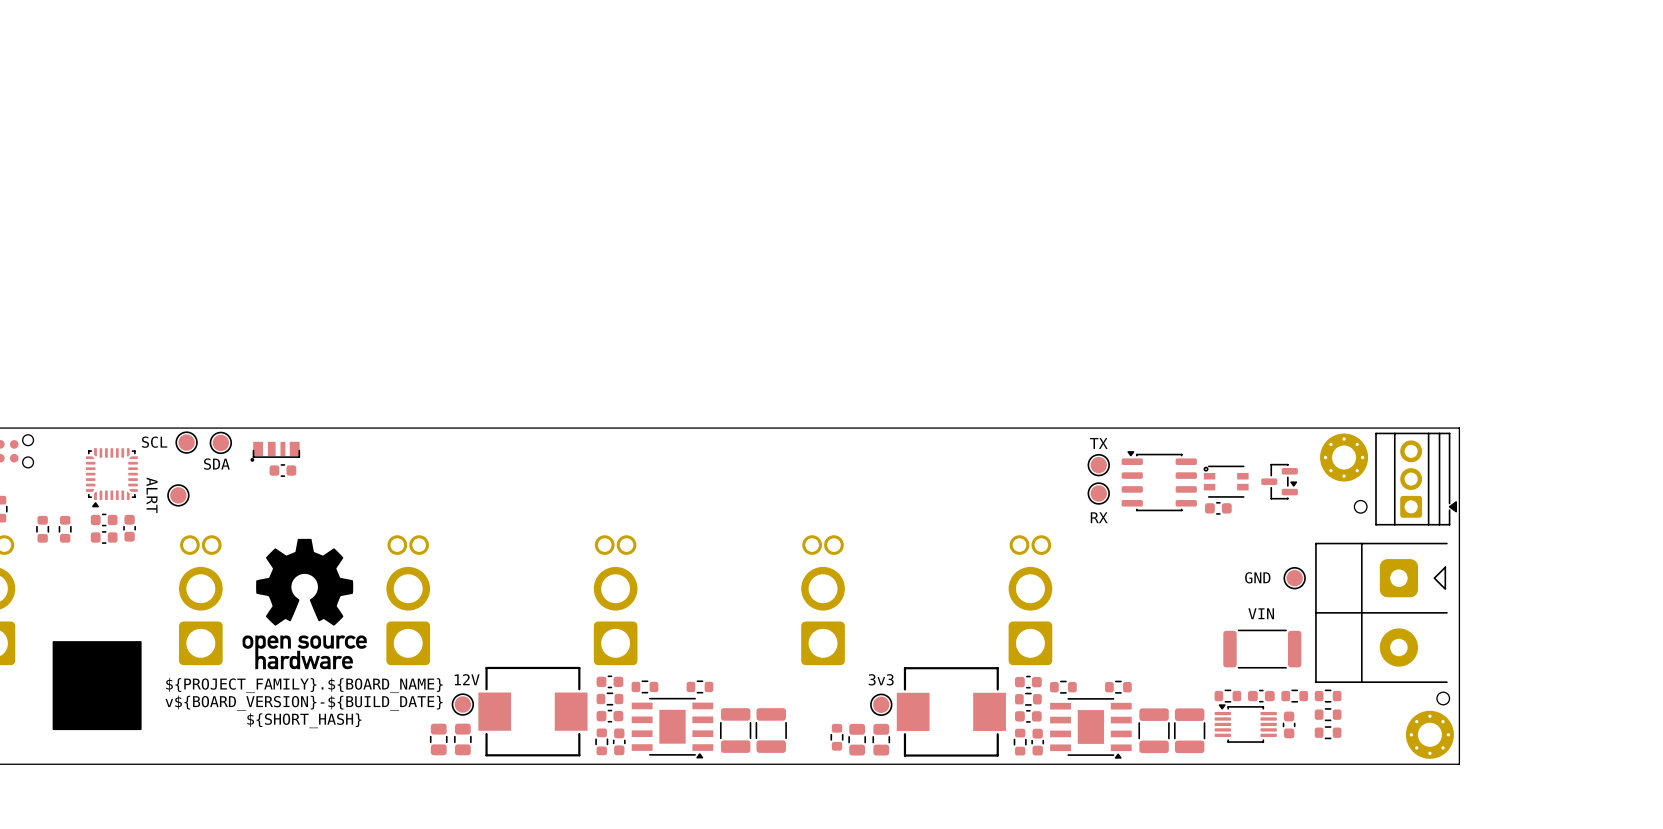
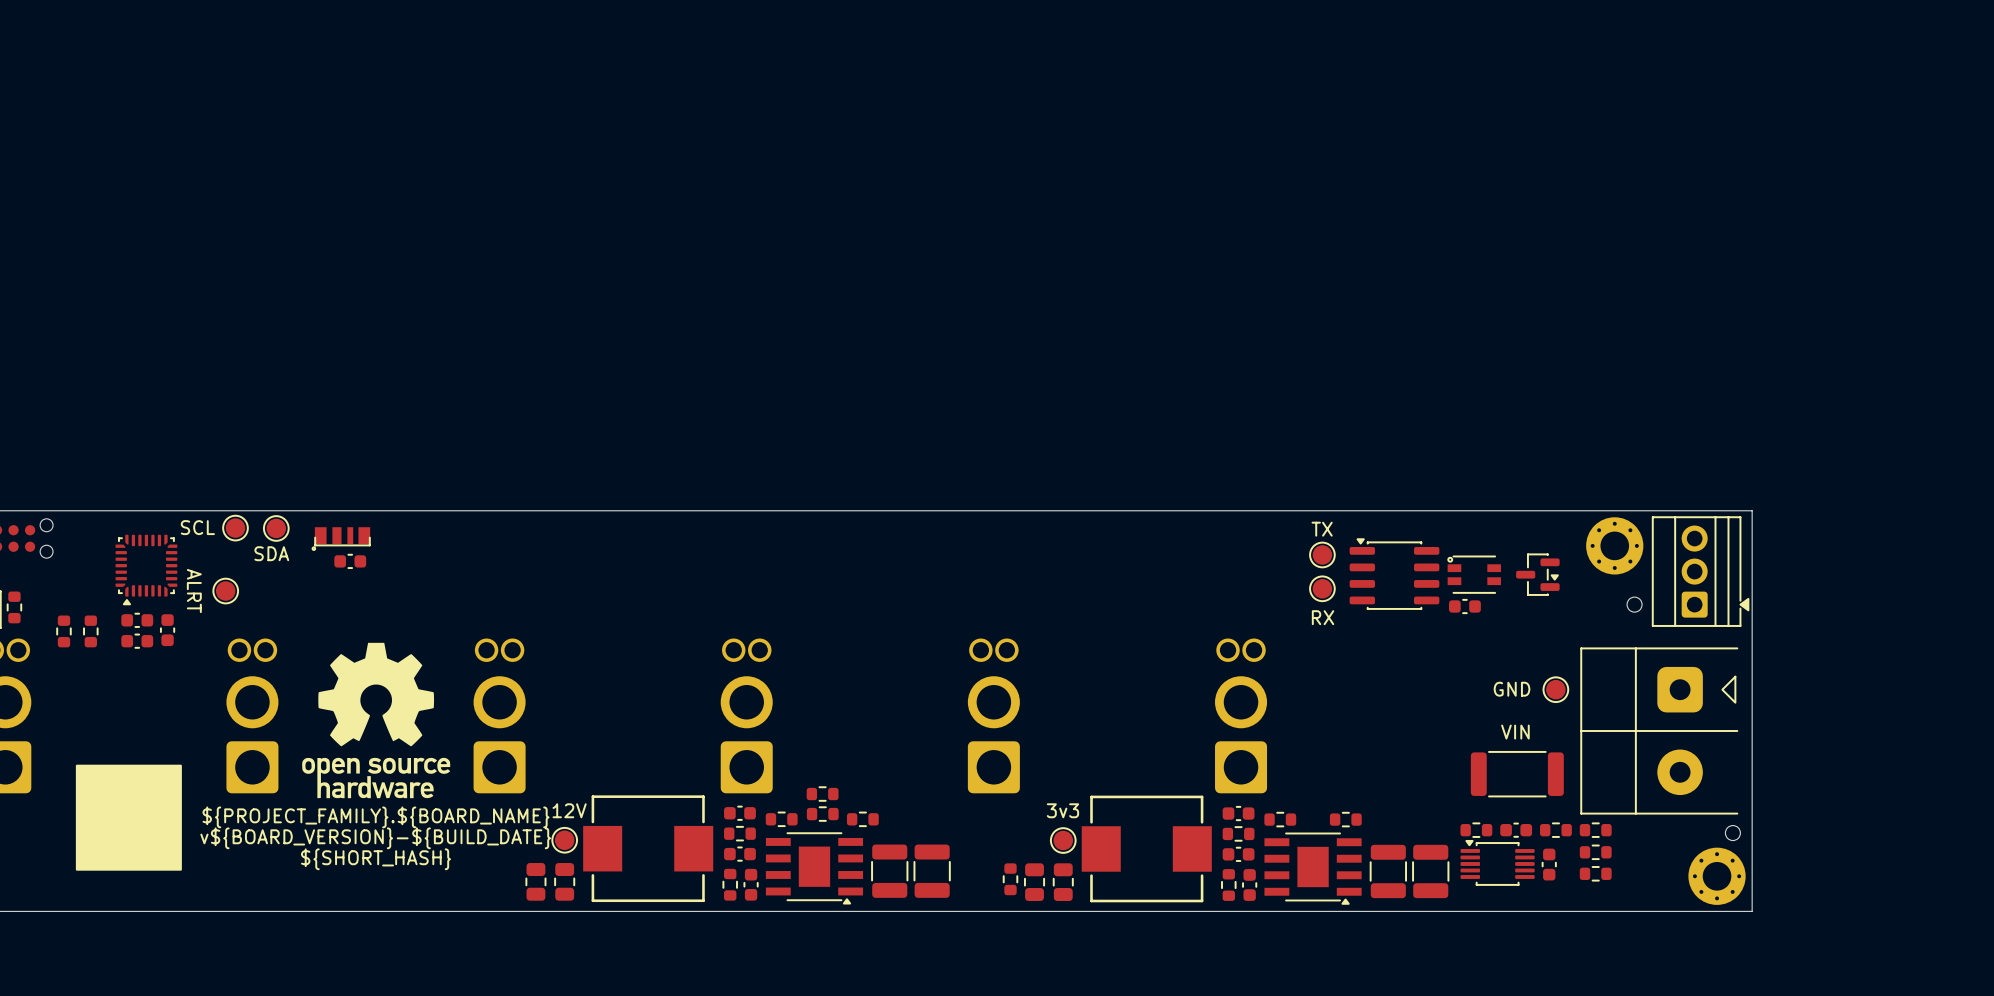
part: none -> (822, 794)
part: none -> (822, 814)
part: (699, 686) -> none
part: none -> (862, 819)

